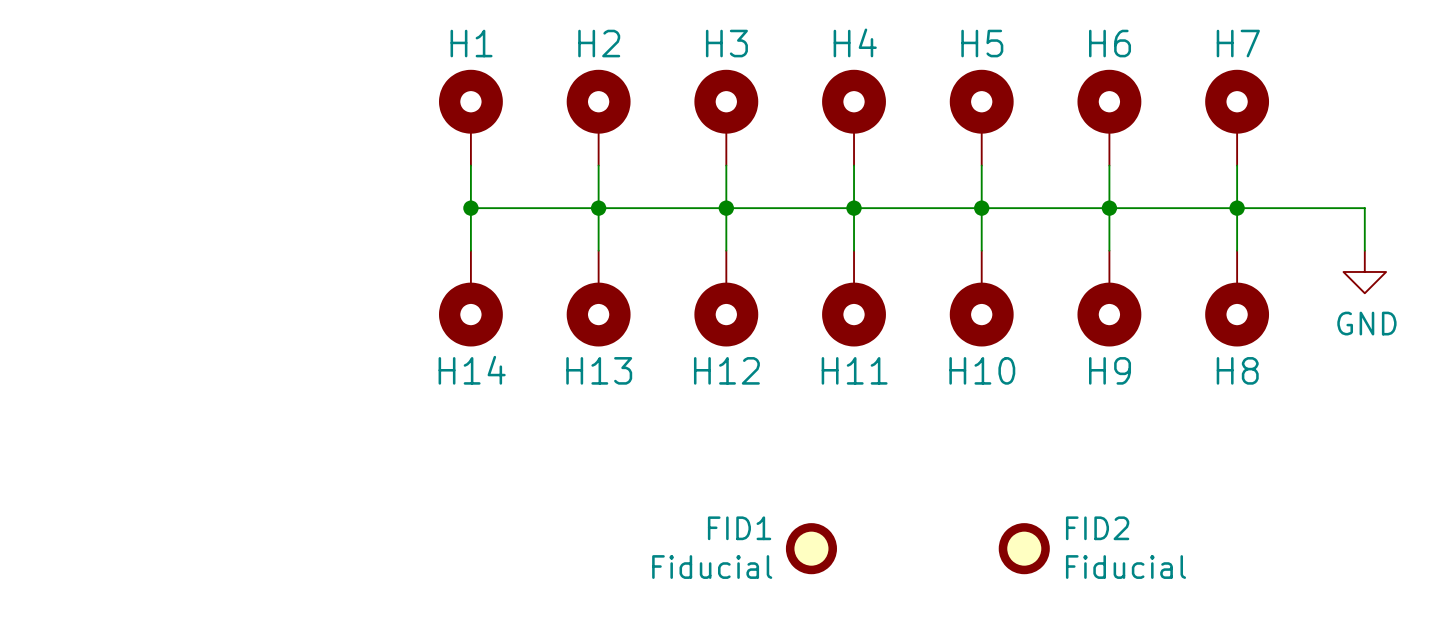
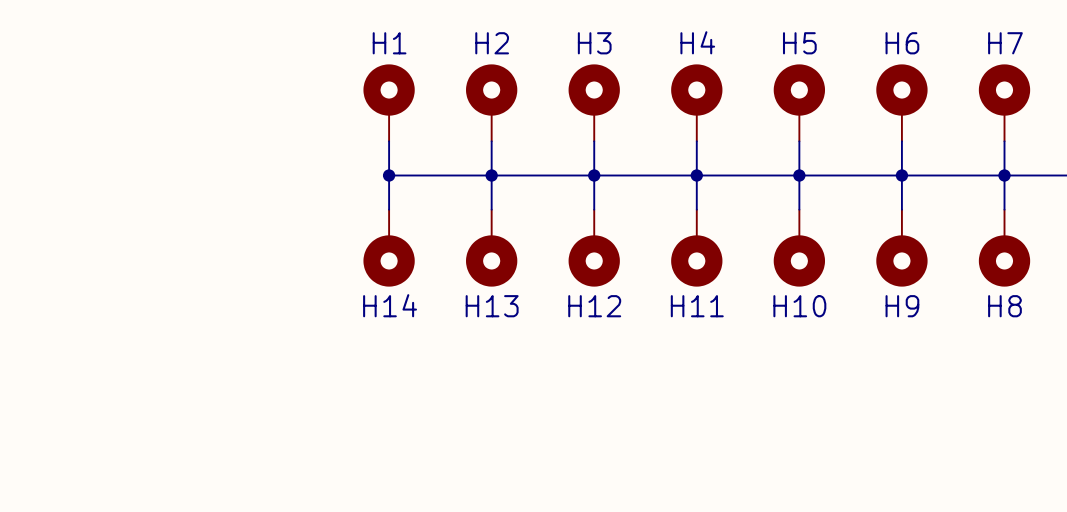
FID1: Fiducial (811, 548) -> none
FID2: Fiducial (1024, 548) -> none

